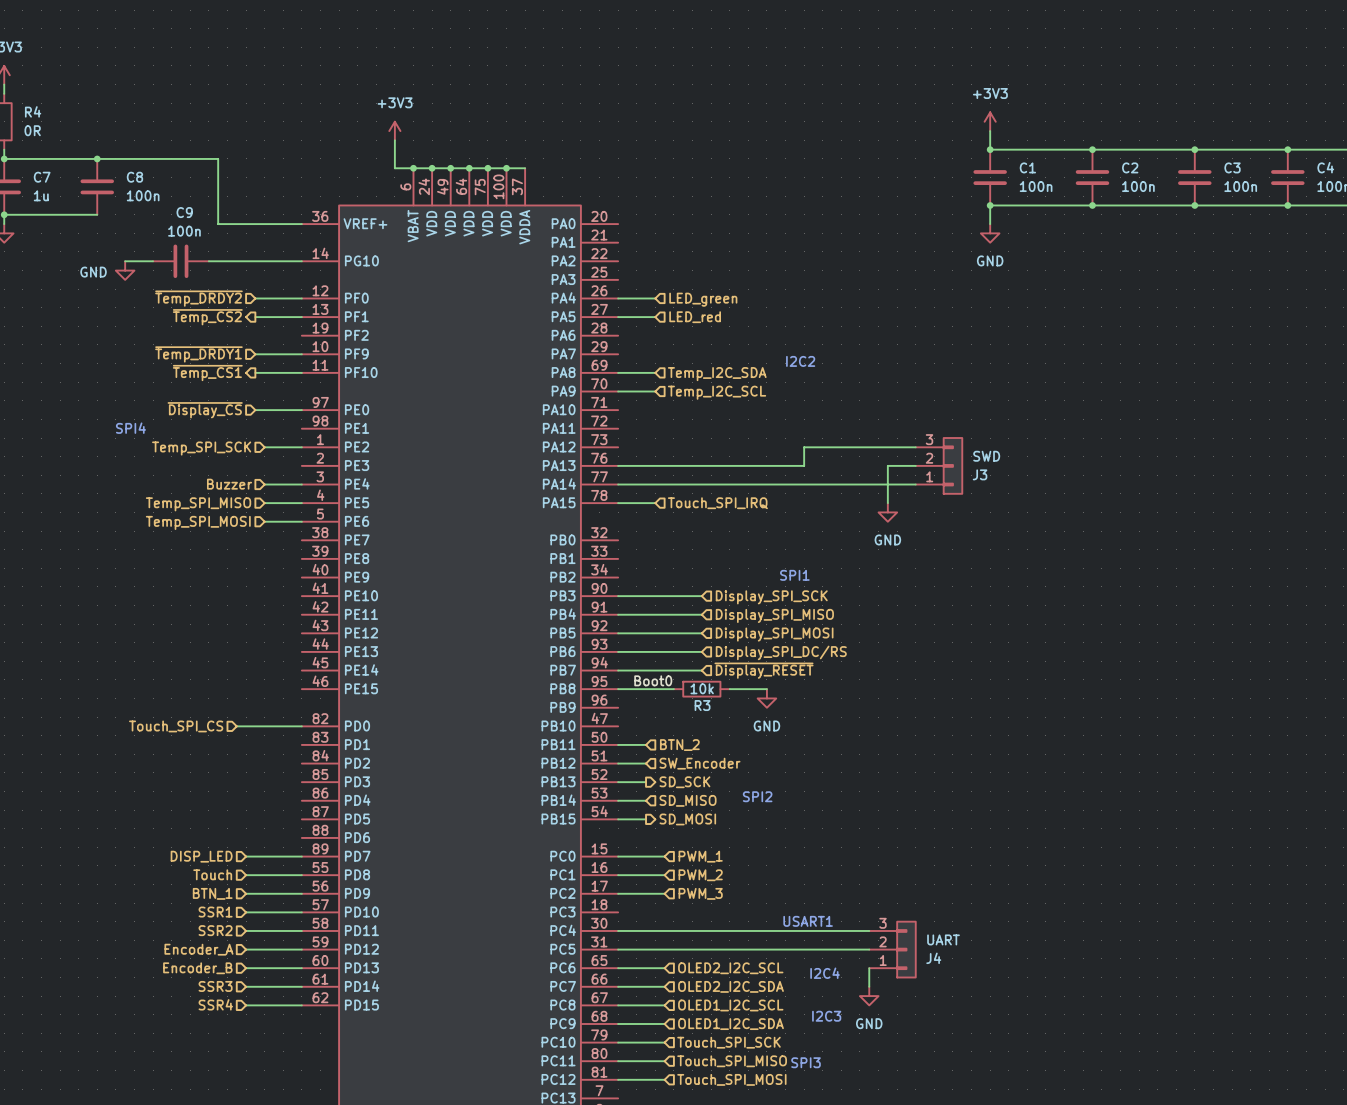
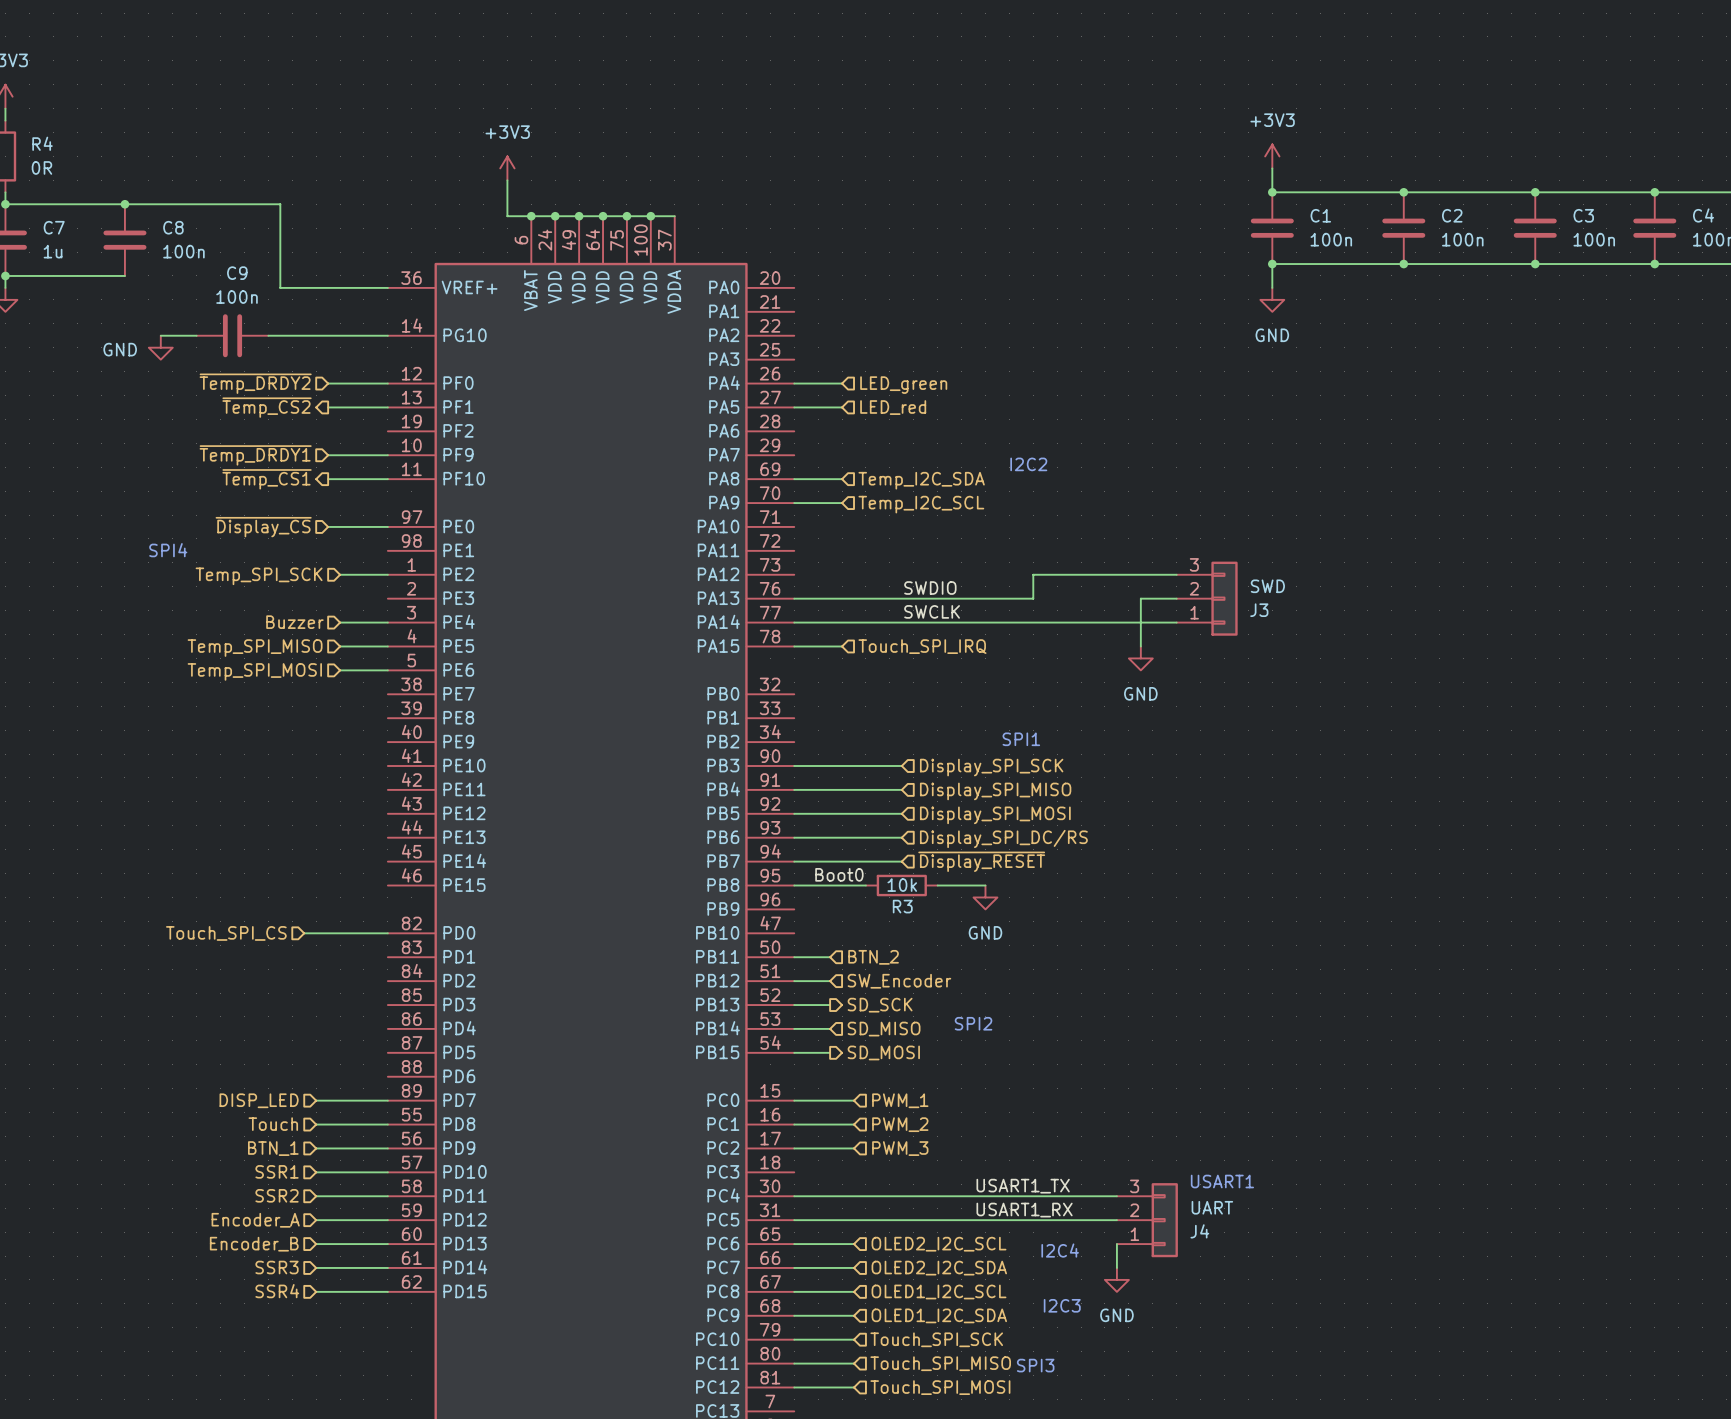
label: none -> SWDIO (930, 588)
label: none -> SWCLK (932, 611)
text position: USART1 (808, 921) -> USART1 (1222, 1181)
label: none -> USART1_TX (1023, 1186)
label: none -> USART1_RX (1024, 1210)

